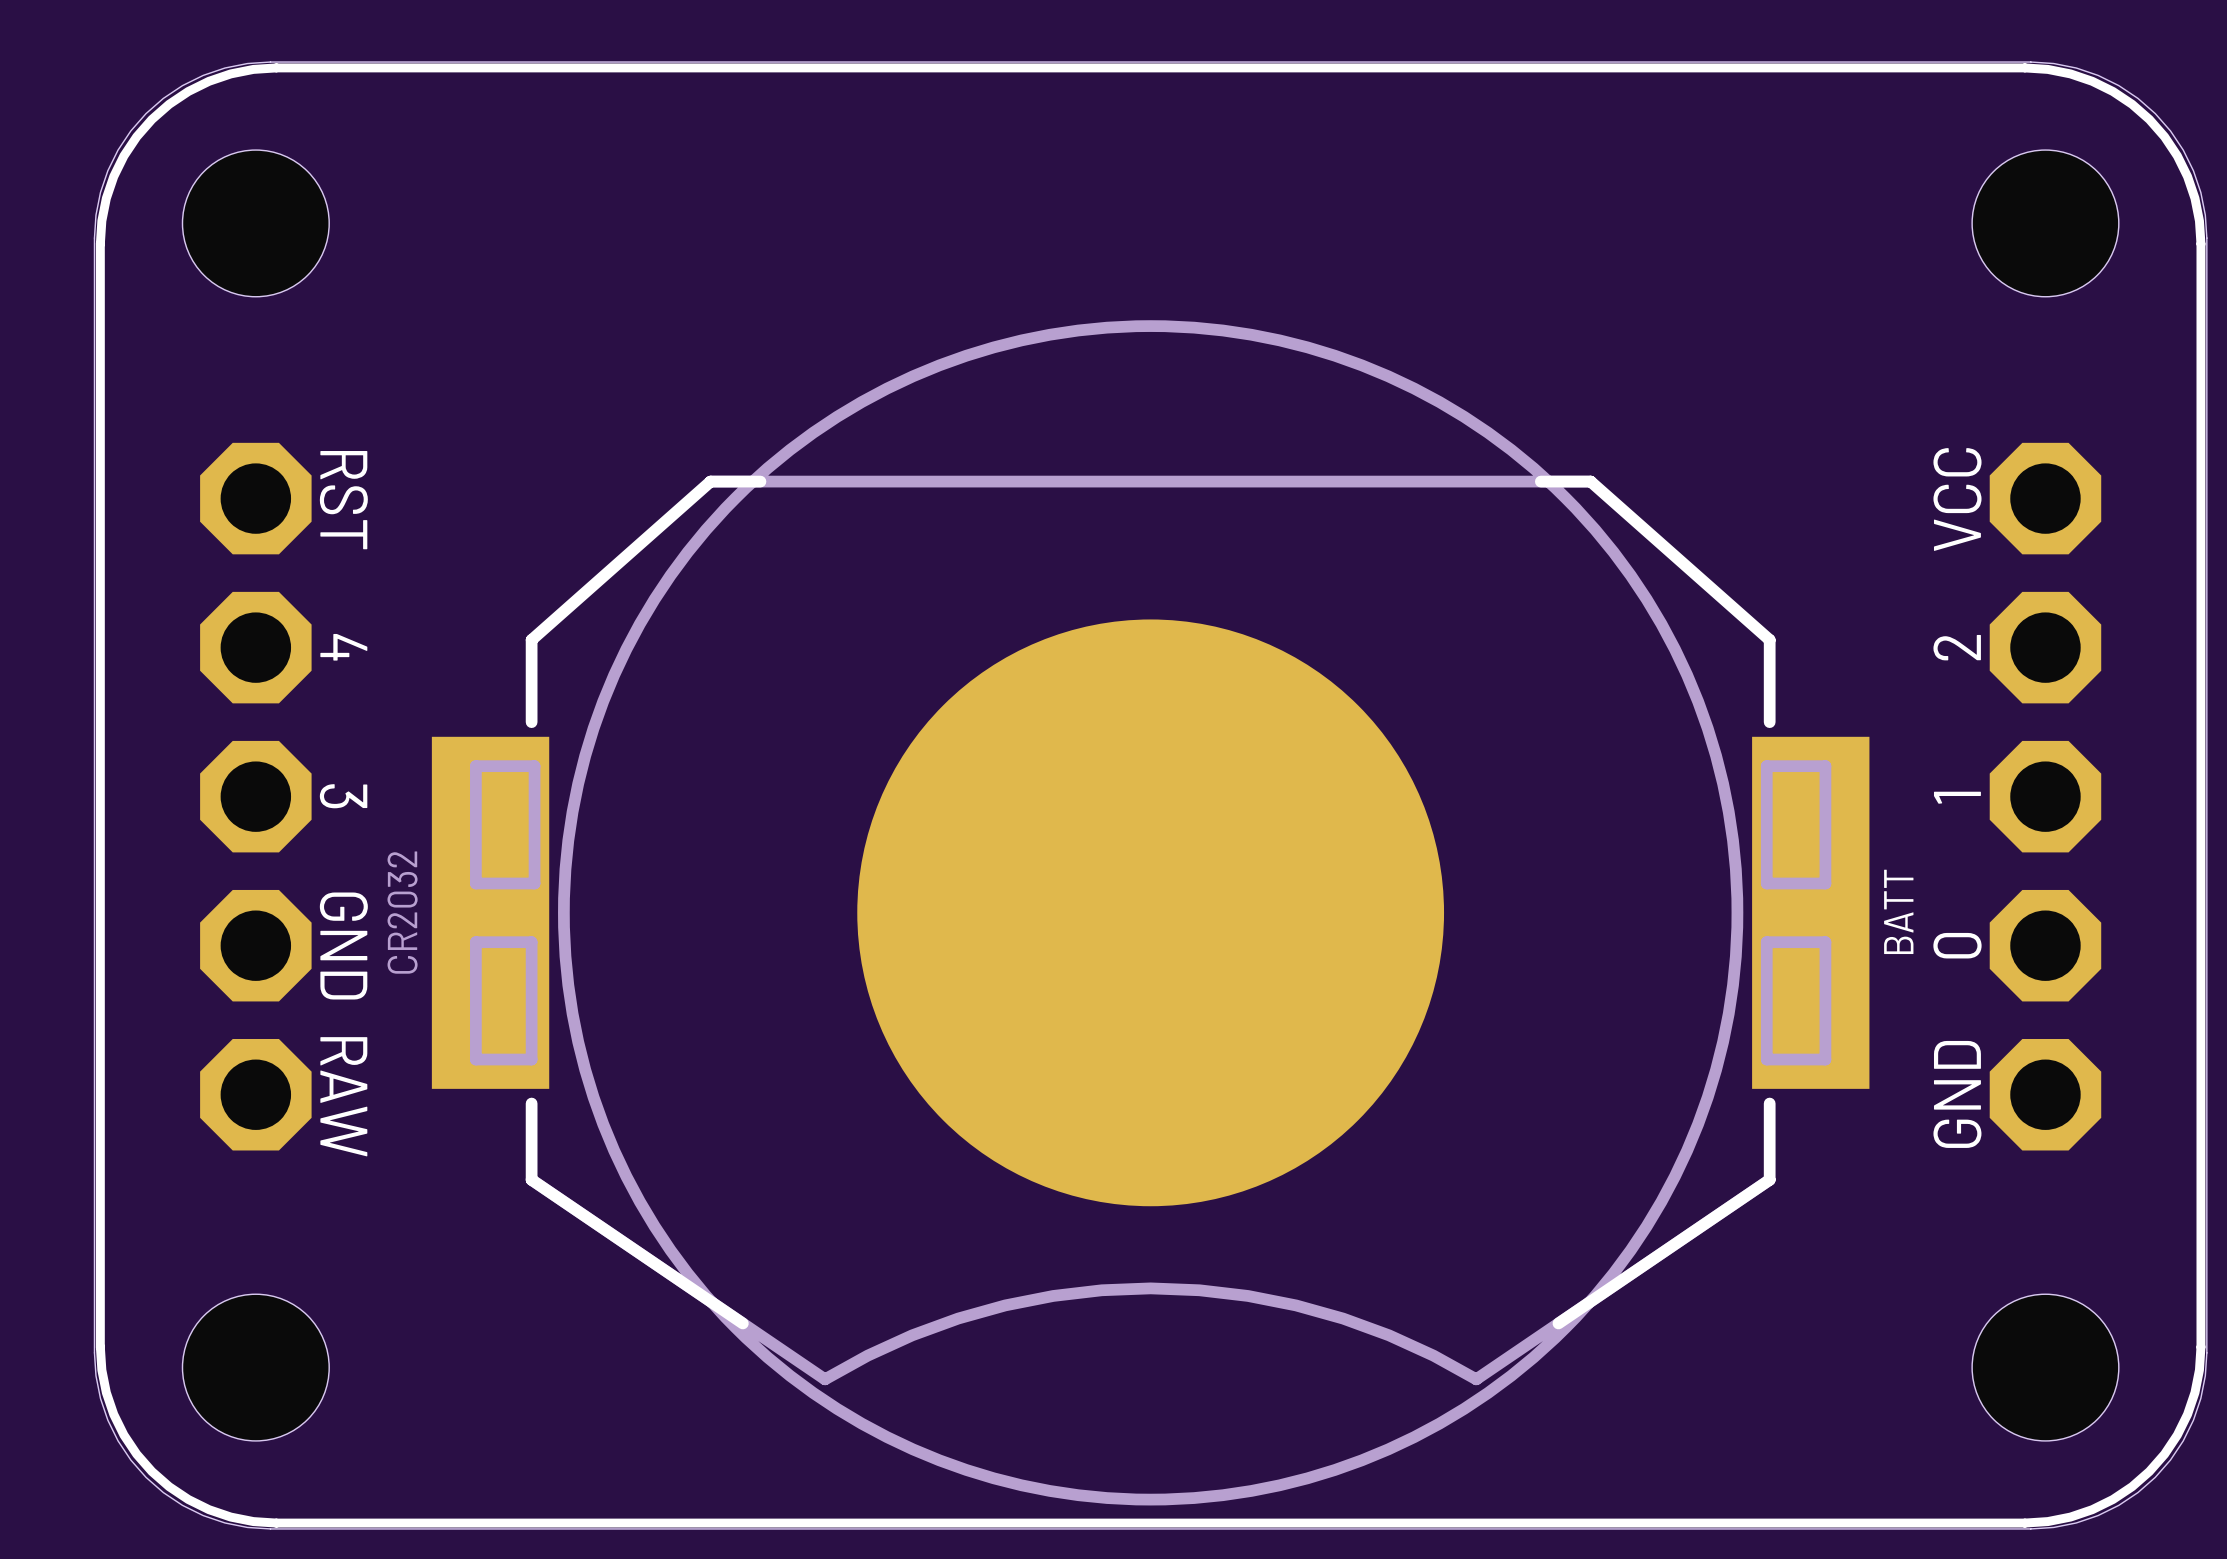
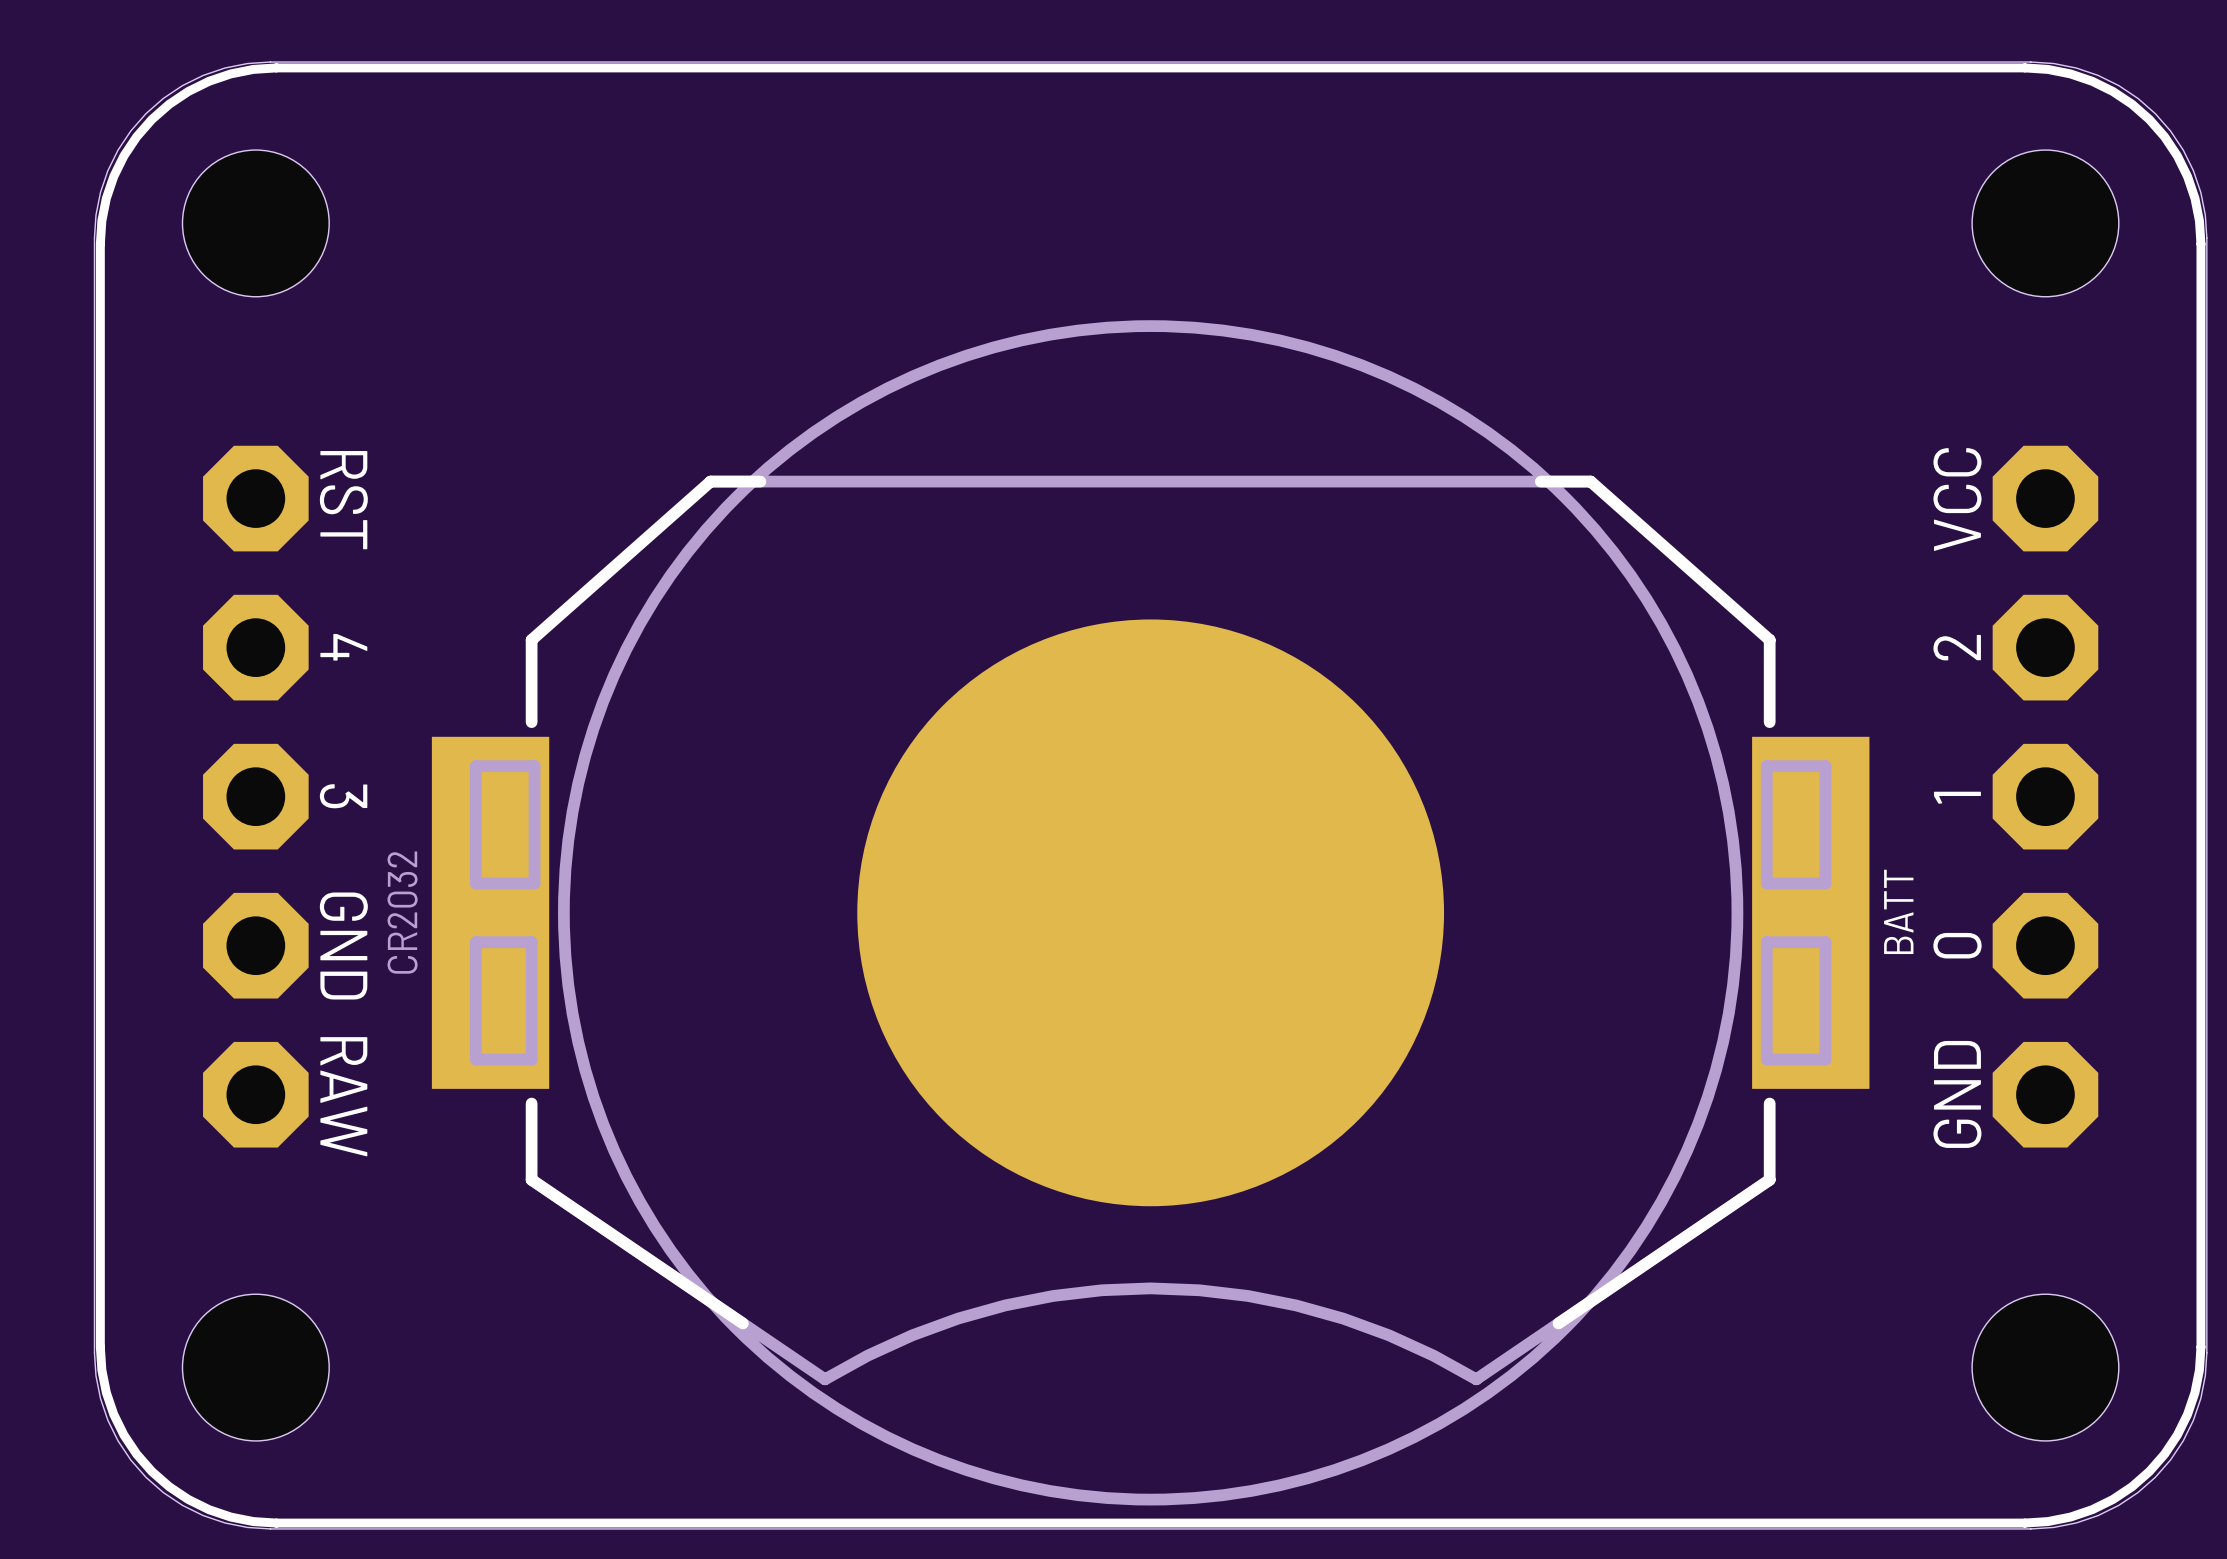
part footprint: [95, 63, 2206, 1528] -> [95, 63, 2206, 1528]

